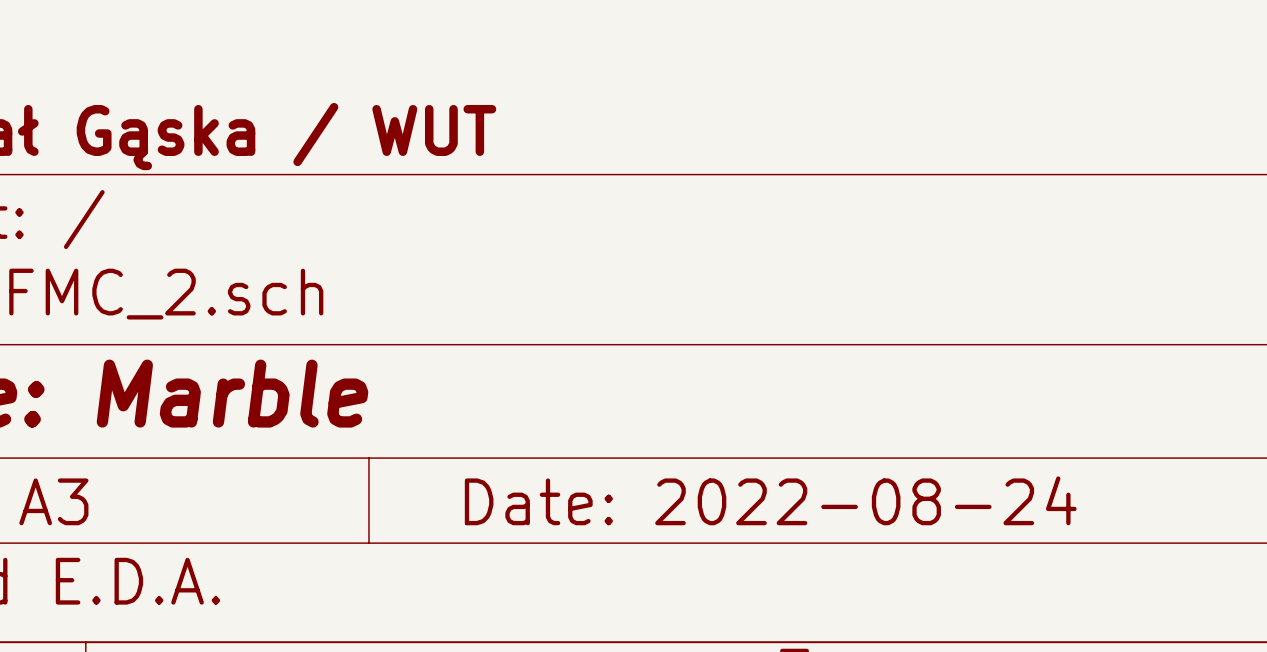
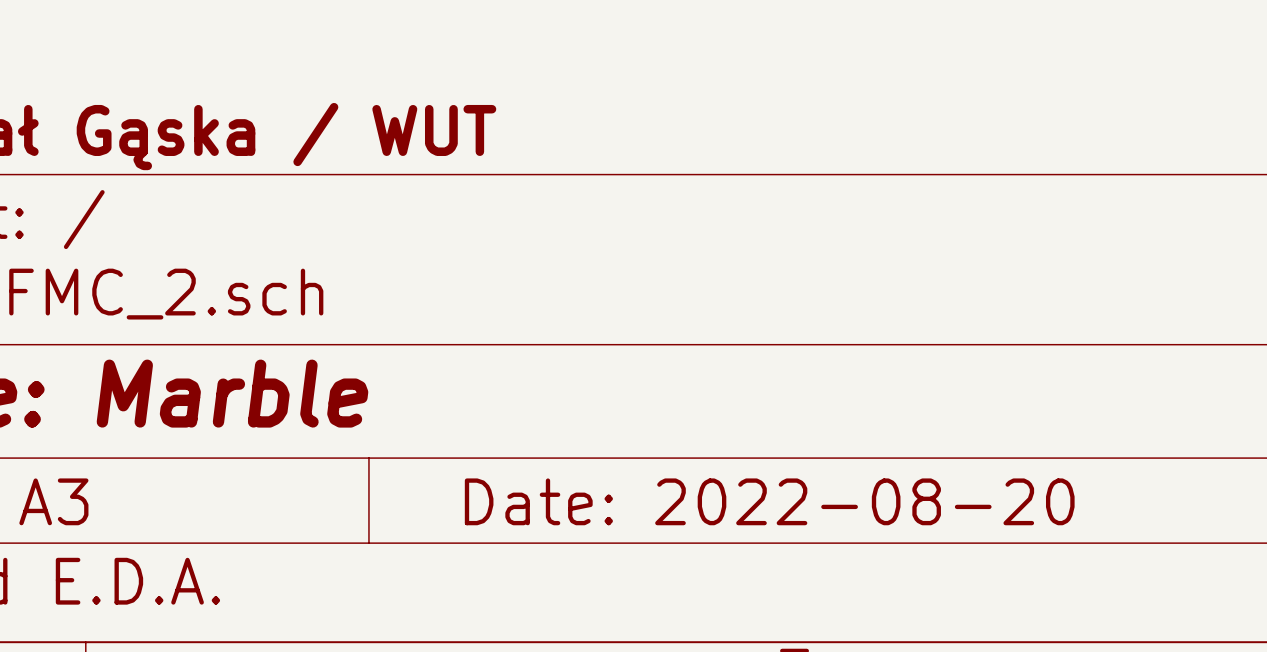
title block: Date: 2022-08-24 (770, 500) -> Date: 2022-08-20 (769, 501)

